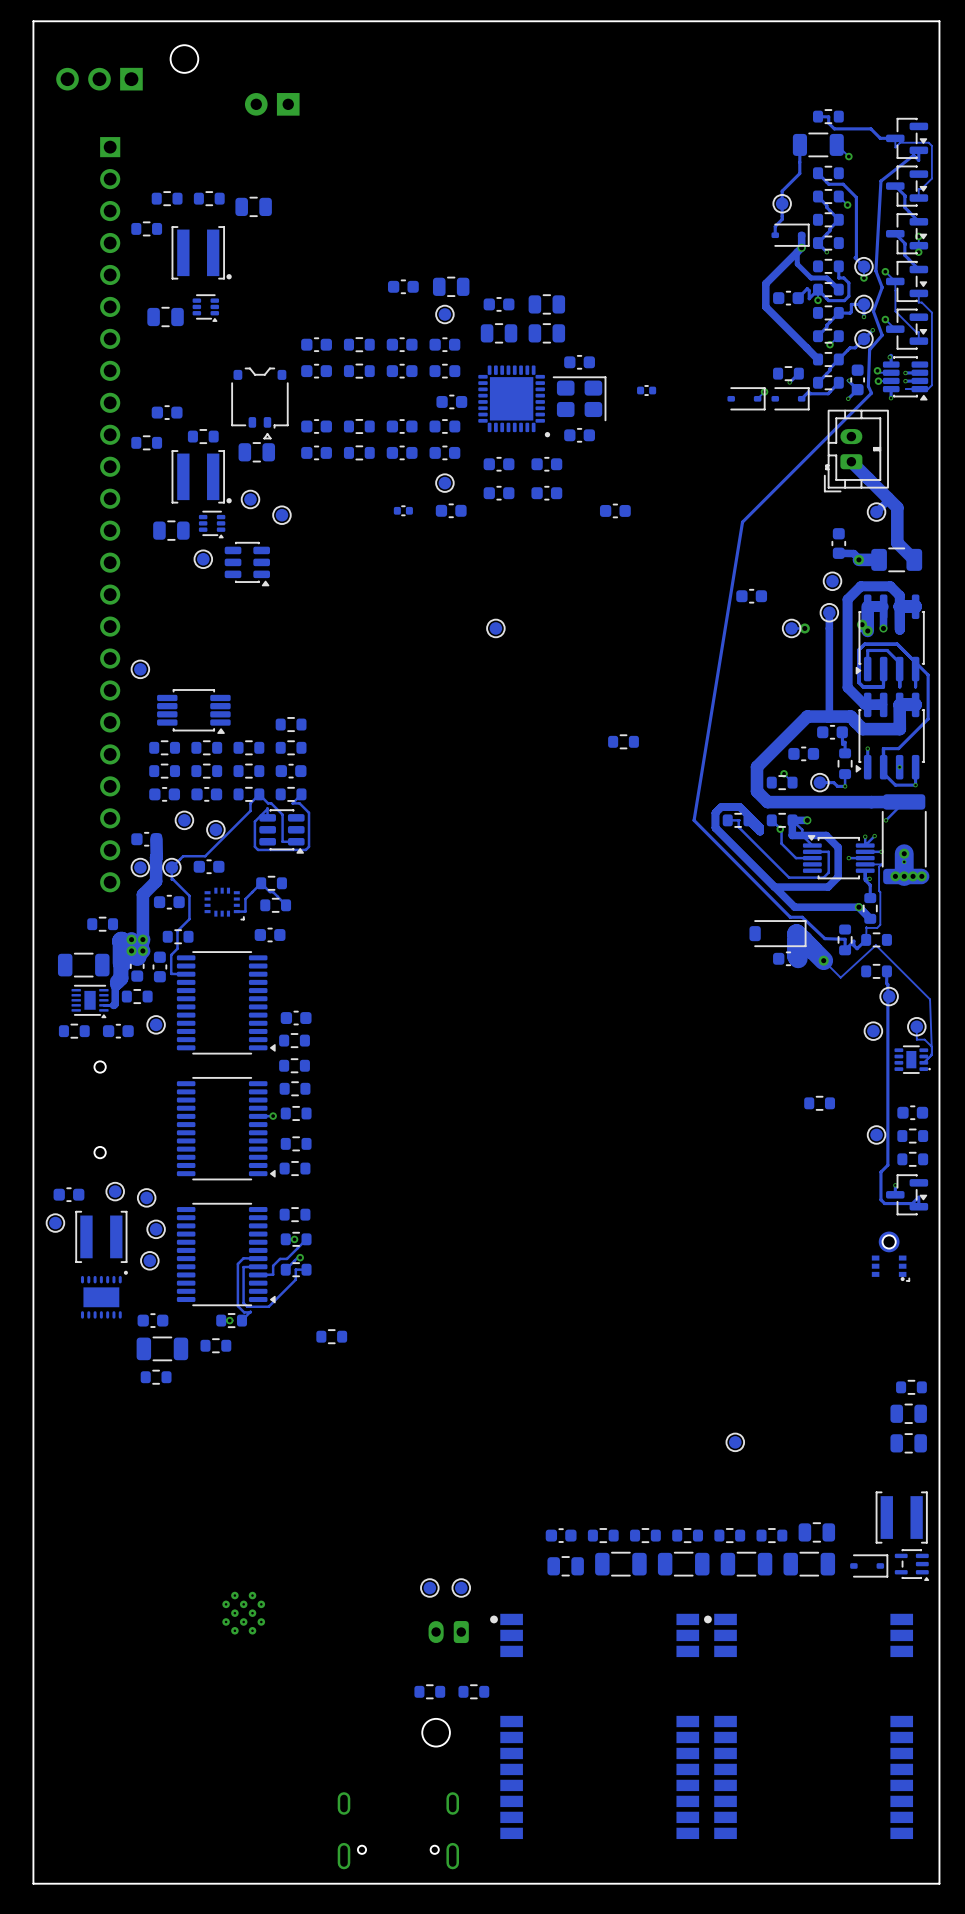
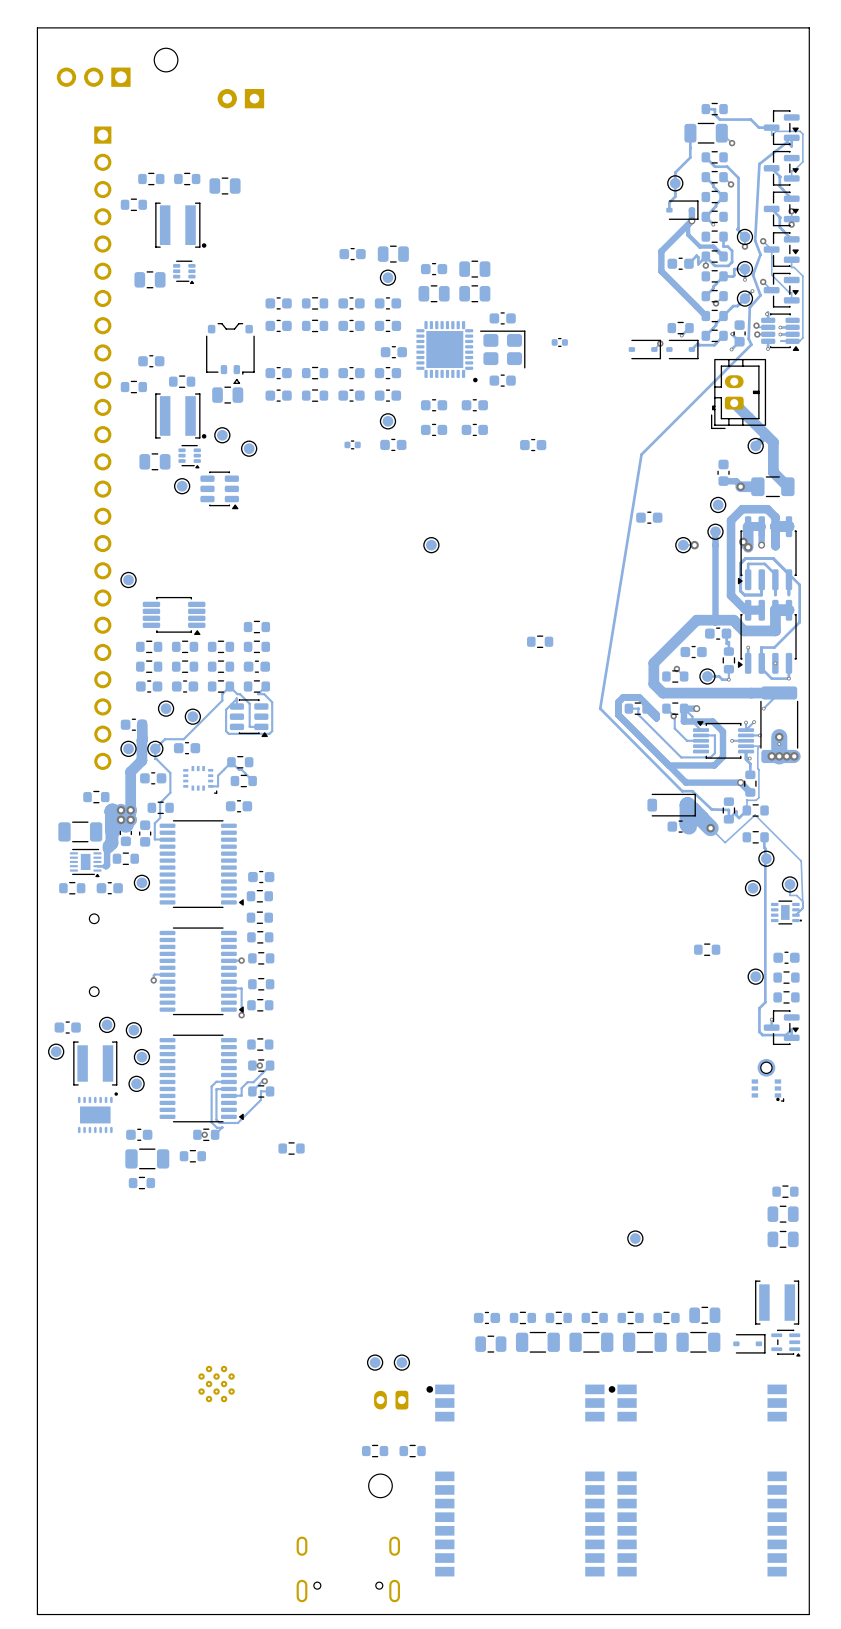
track: none -> (167, 974) (154, 974) (153, 980)
via: none -> (153, 980)
track: none -> (228, 988) (241, 988) (241, 1015)
via: none -> (241, 1015)

